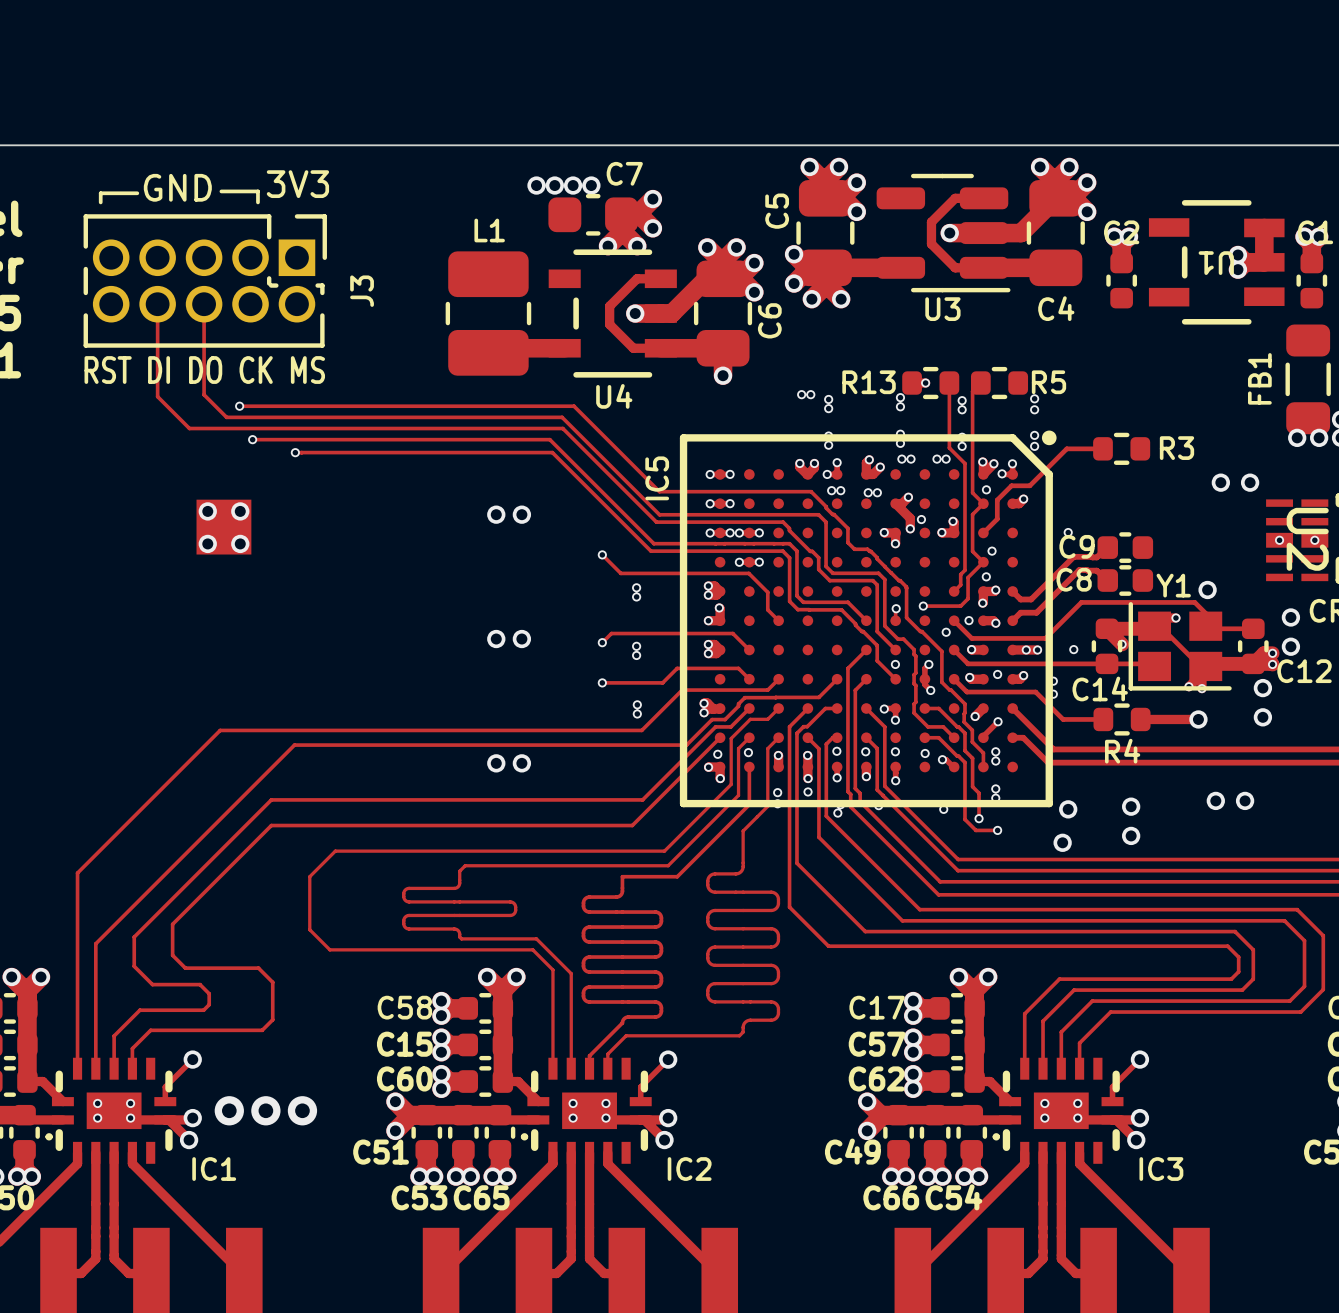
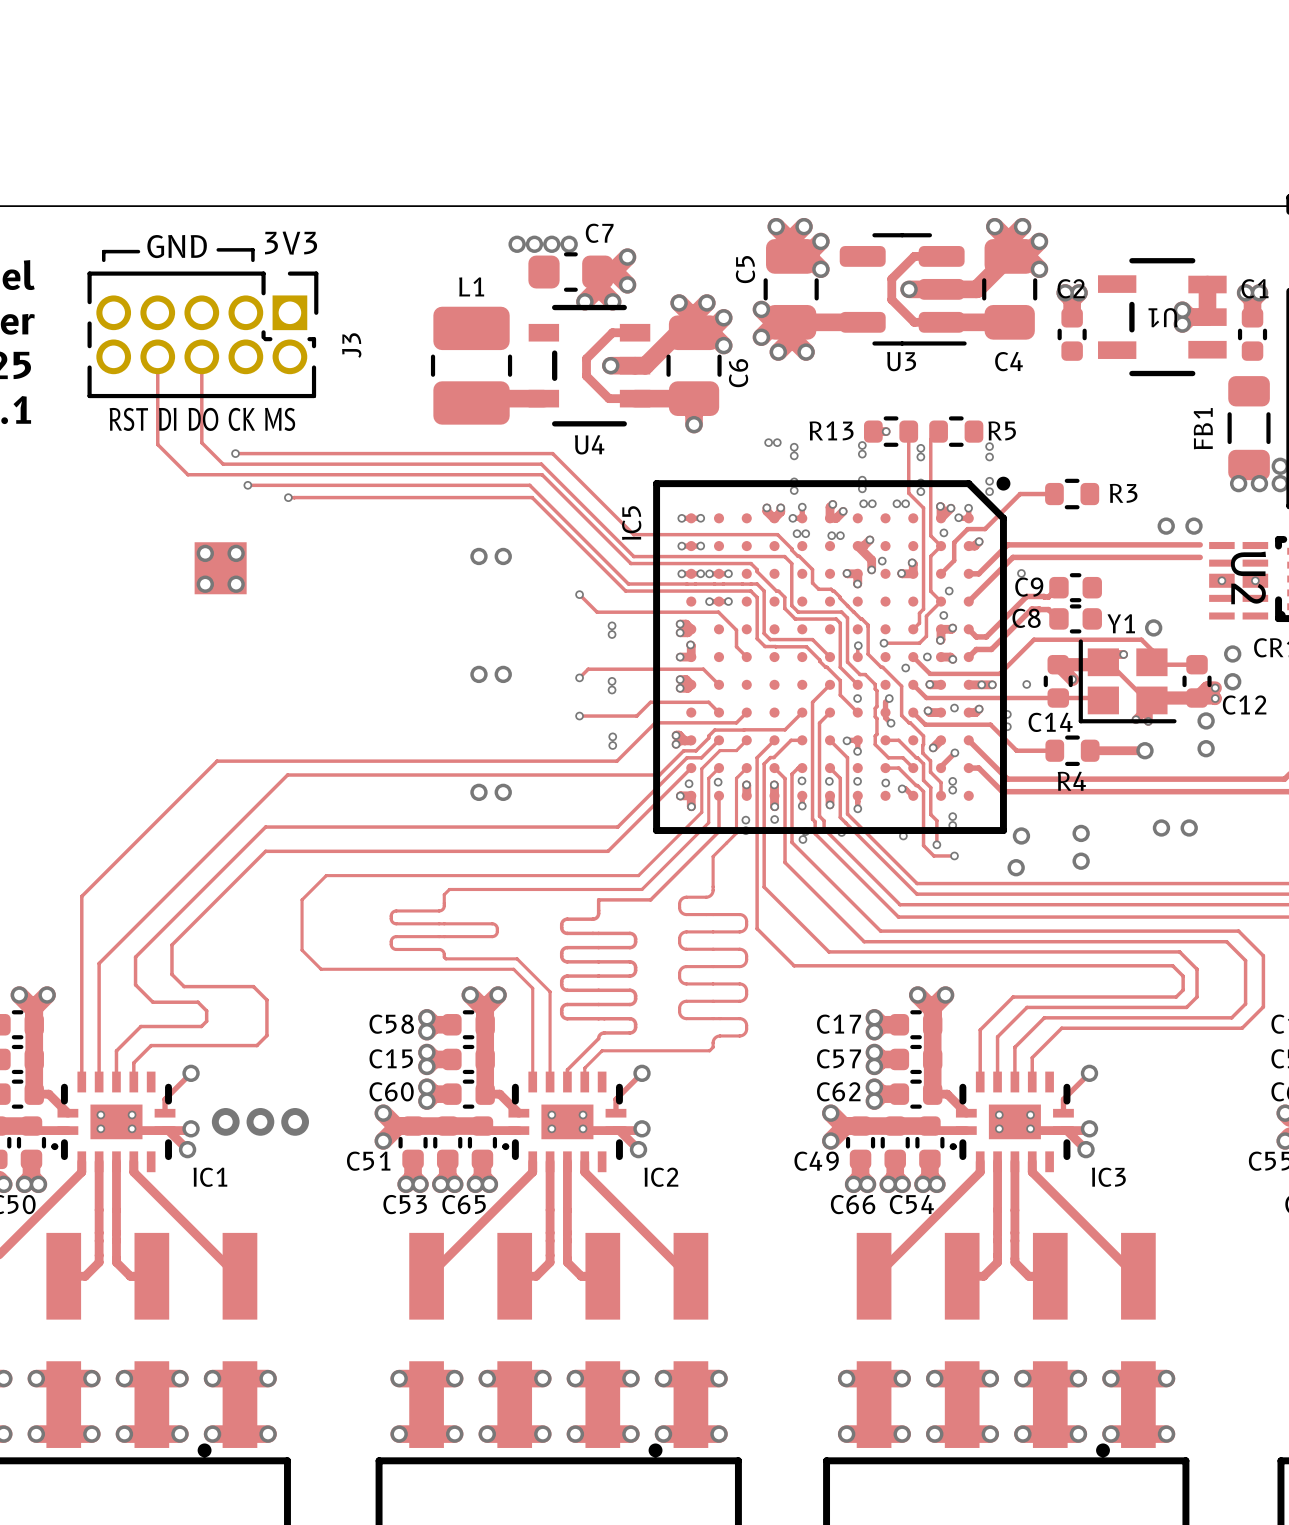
track: none -> (1200, 544) (1007, 544) (978, 573) (968, 573)
track: none -> (1200, 557) (1012, 557) (968, 601)

